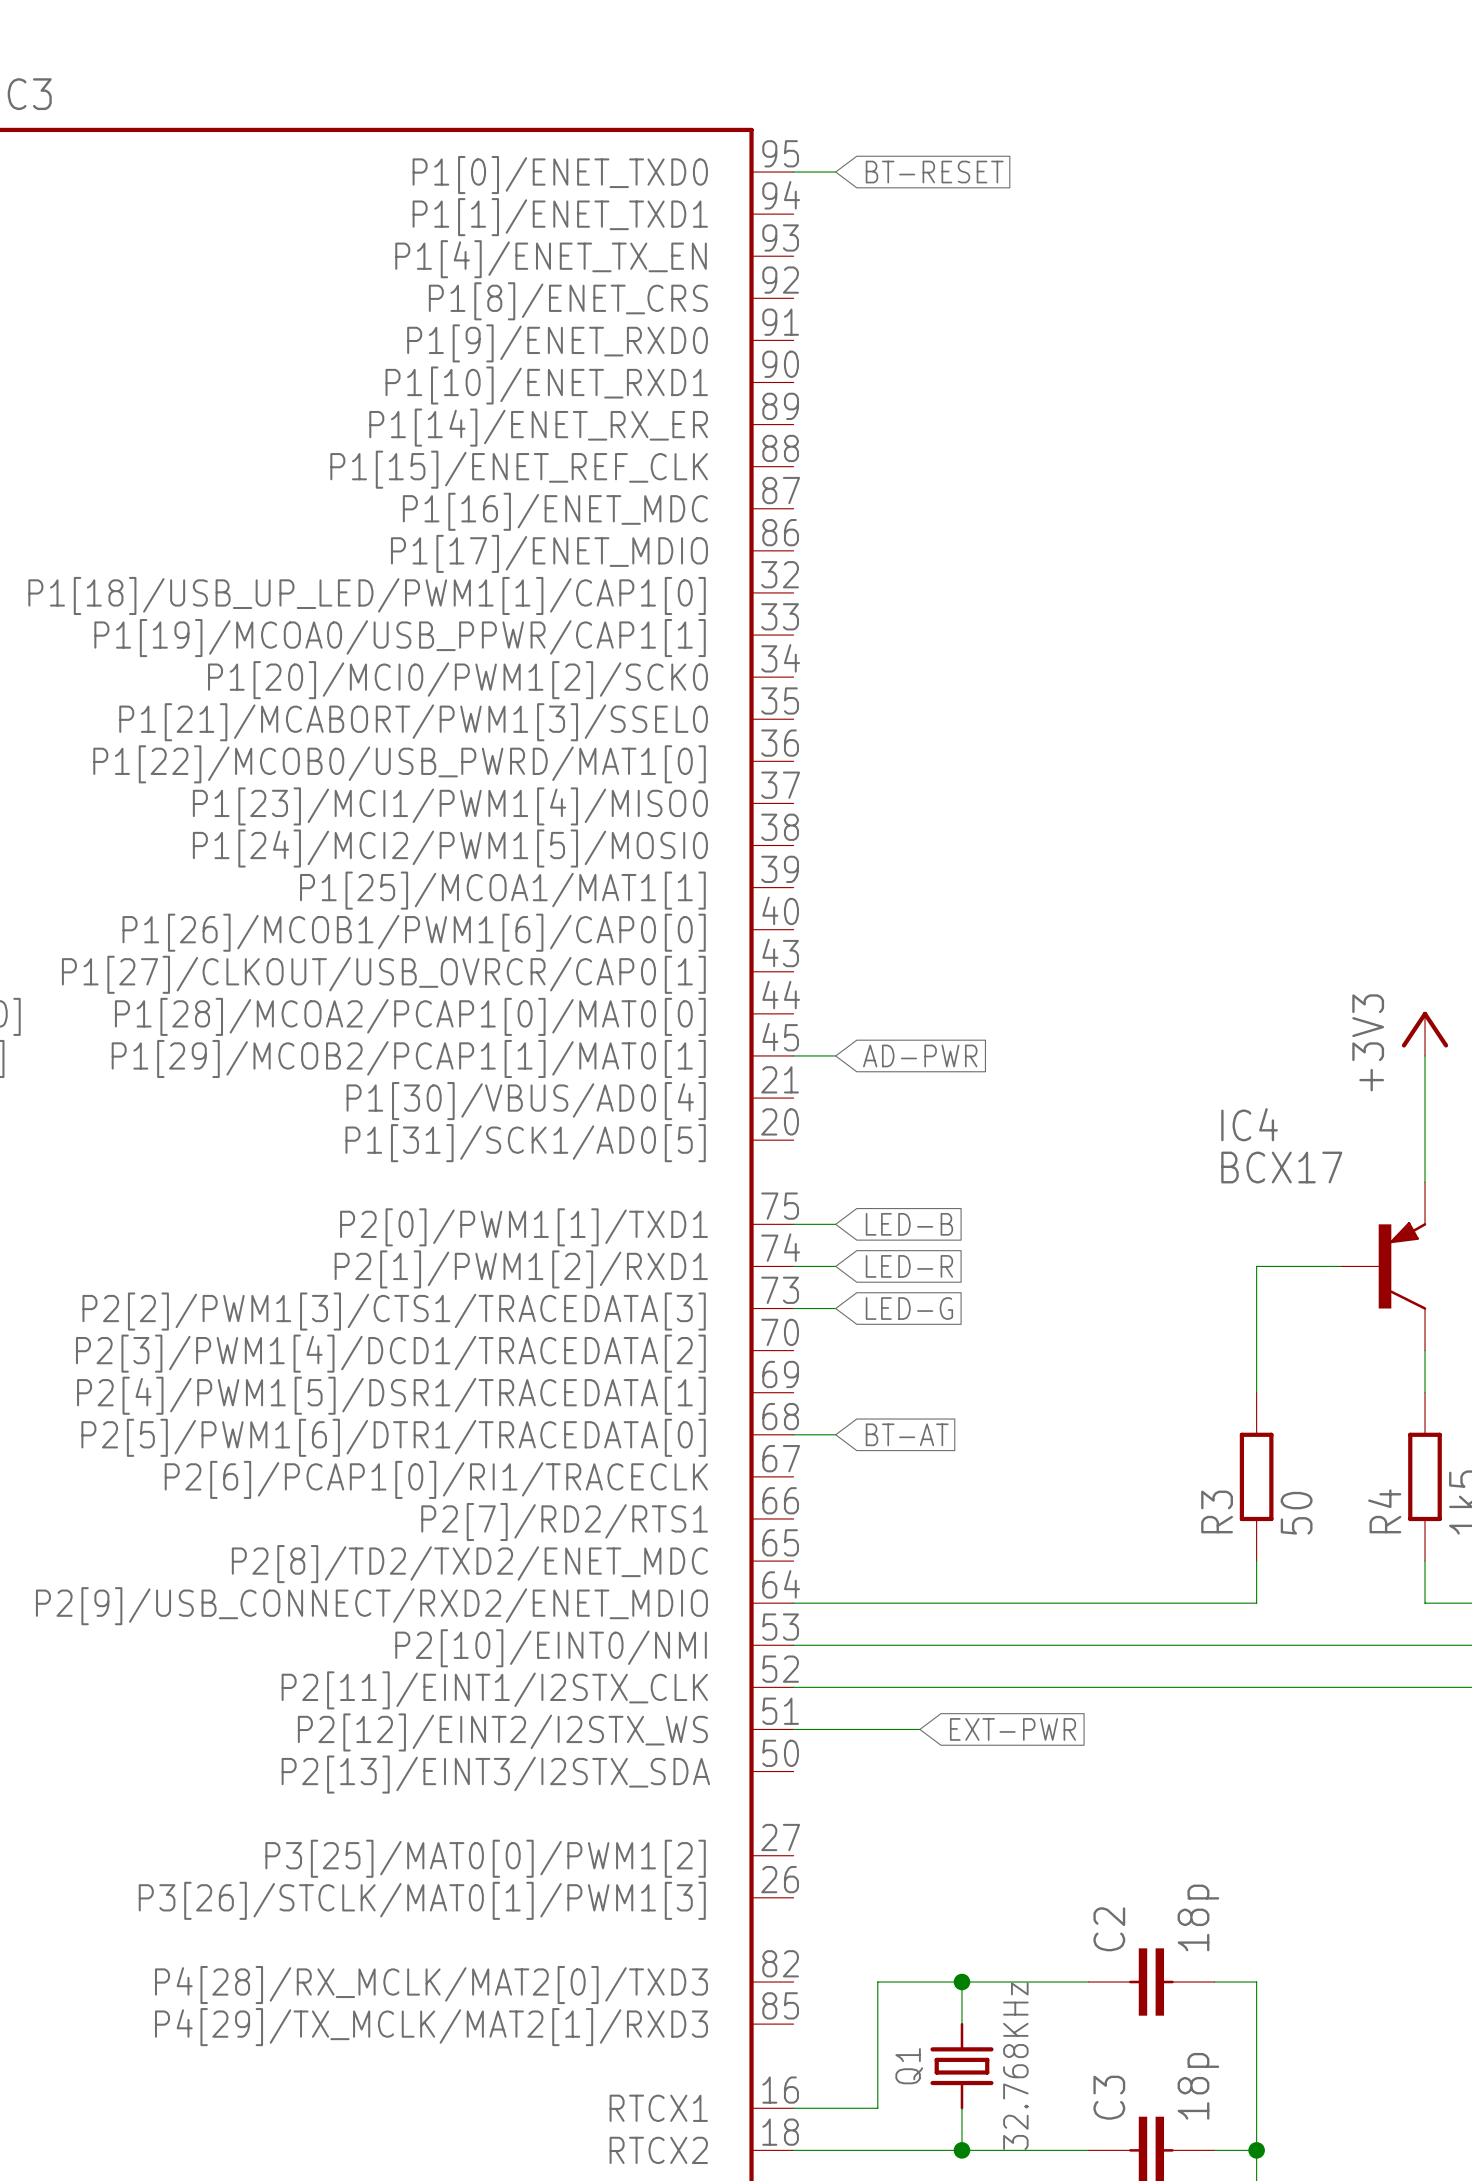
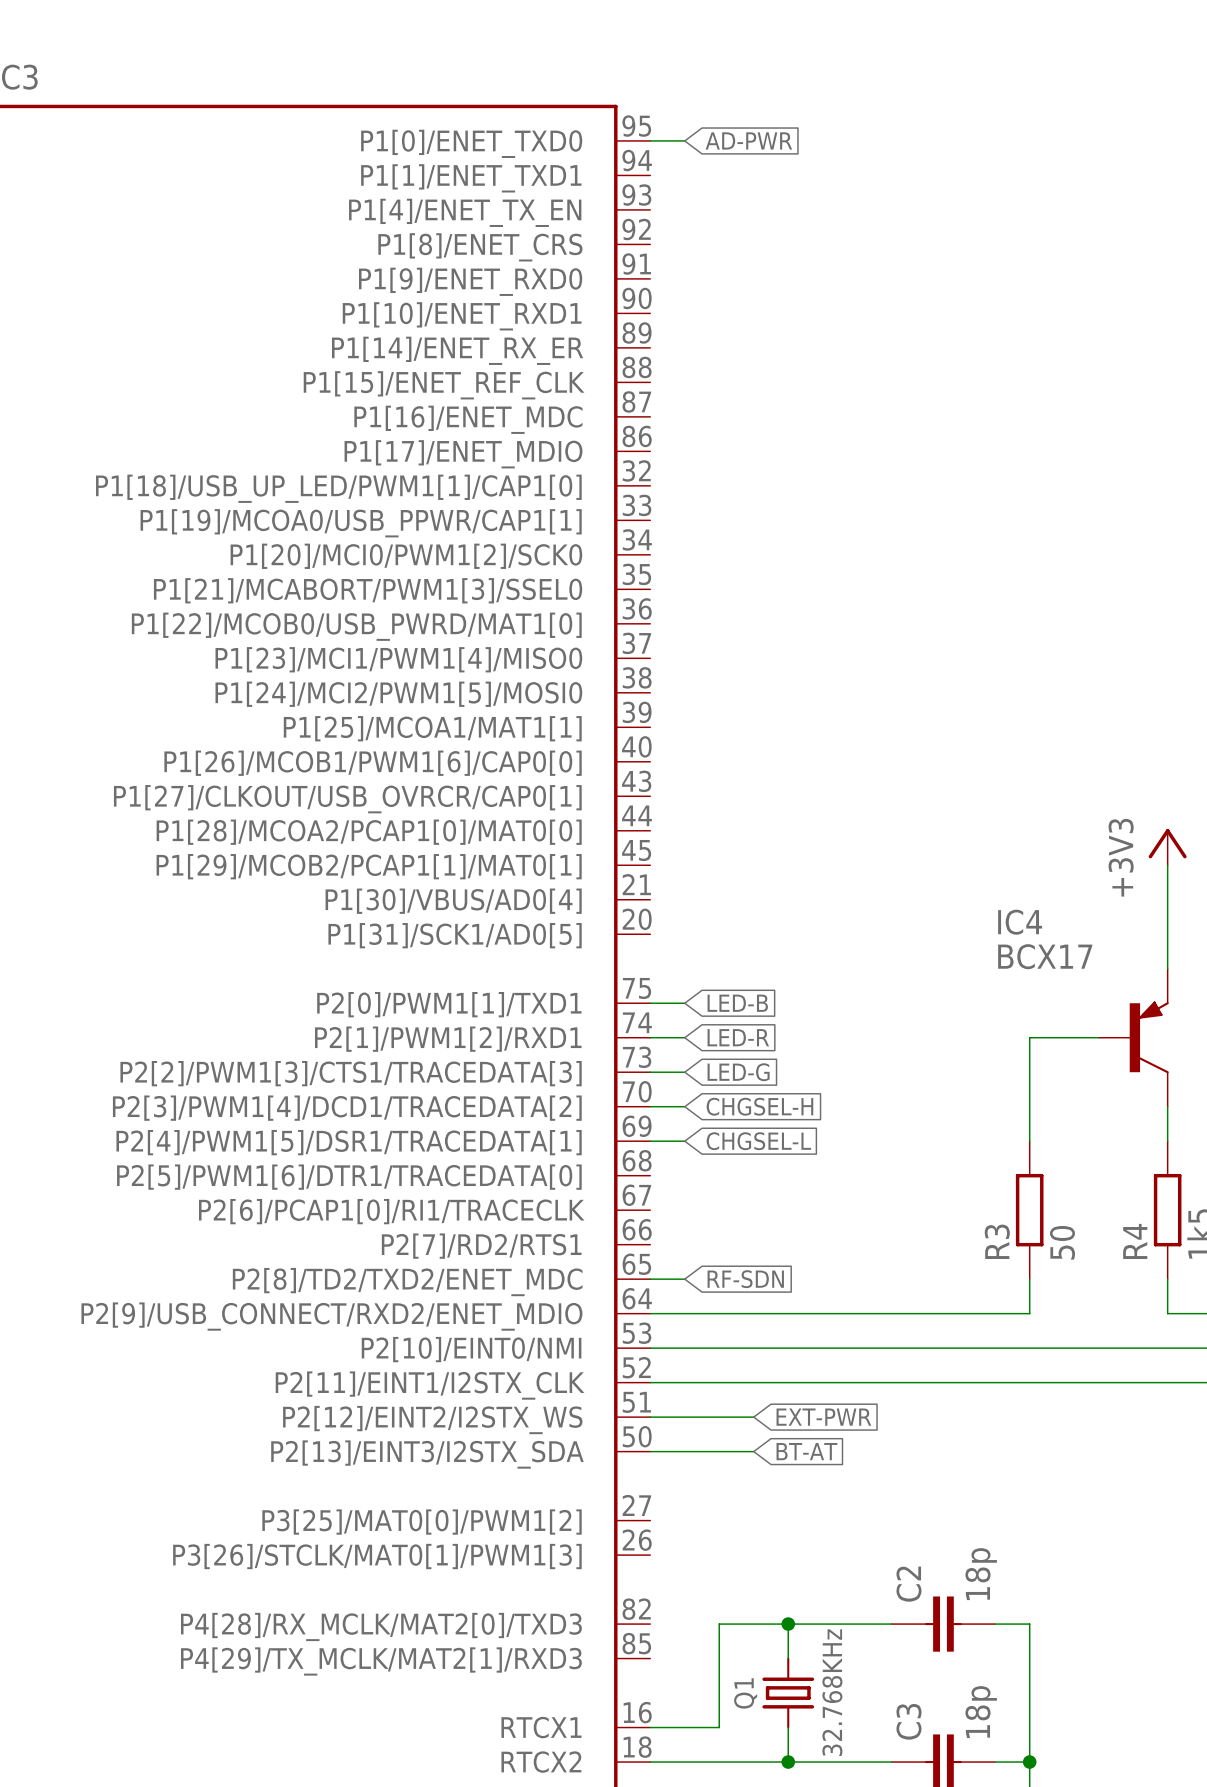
global label: BT-RESET (934, 172) -> AD-PWR (748, 140)
wire: (793, 1055) (835, 1055) -> (650, 1106) (684, 1106)
global label: AD-PWR (920, 1055) -> none
global label: none -> CHGSEL-H (759, 1106)
global label: none -> CHGSEL-L (758, 1141)
wire: (793, 1434) (835, 1434) -> (650, 1141) (684, 1141)
global label position: BT-AT (907, 1434) -> BT-AT (806, 1451)
wire: none -> (650, 1279) (684, 1279)
global label: none -> RF-SDN (745, 1279)
wire: none -> (650, 1451) (753, 1451)

